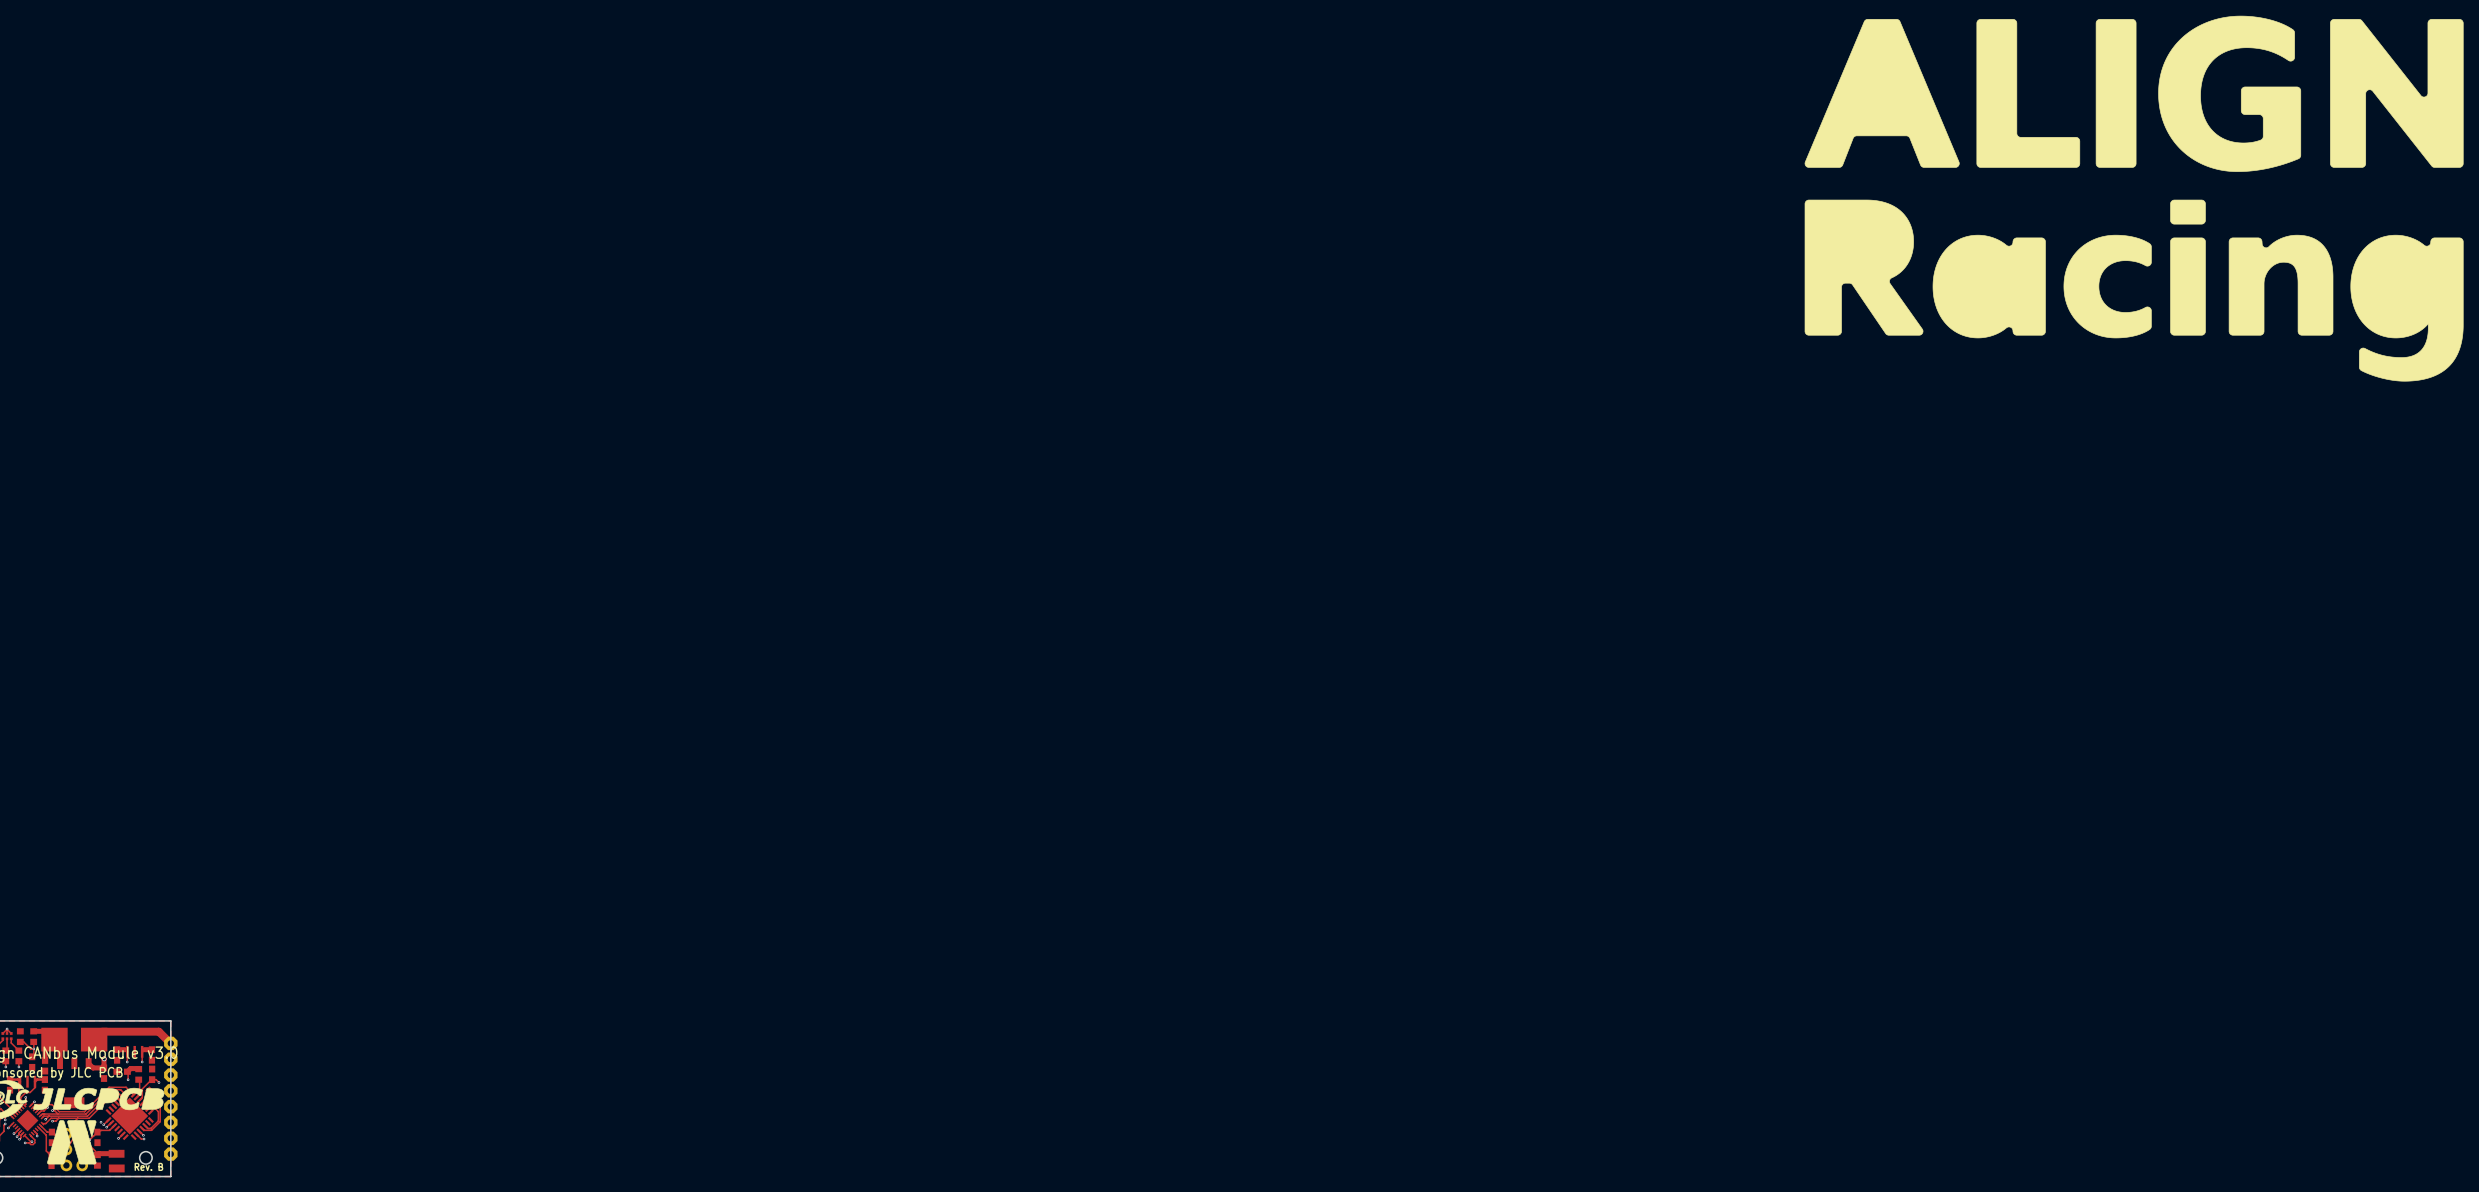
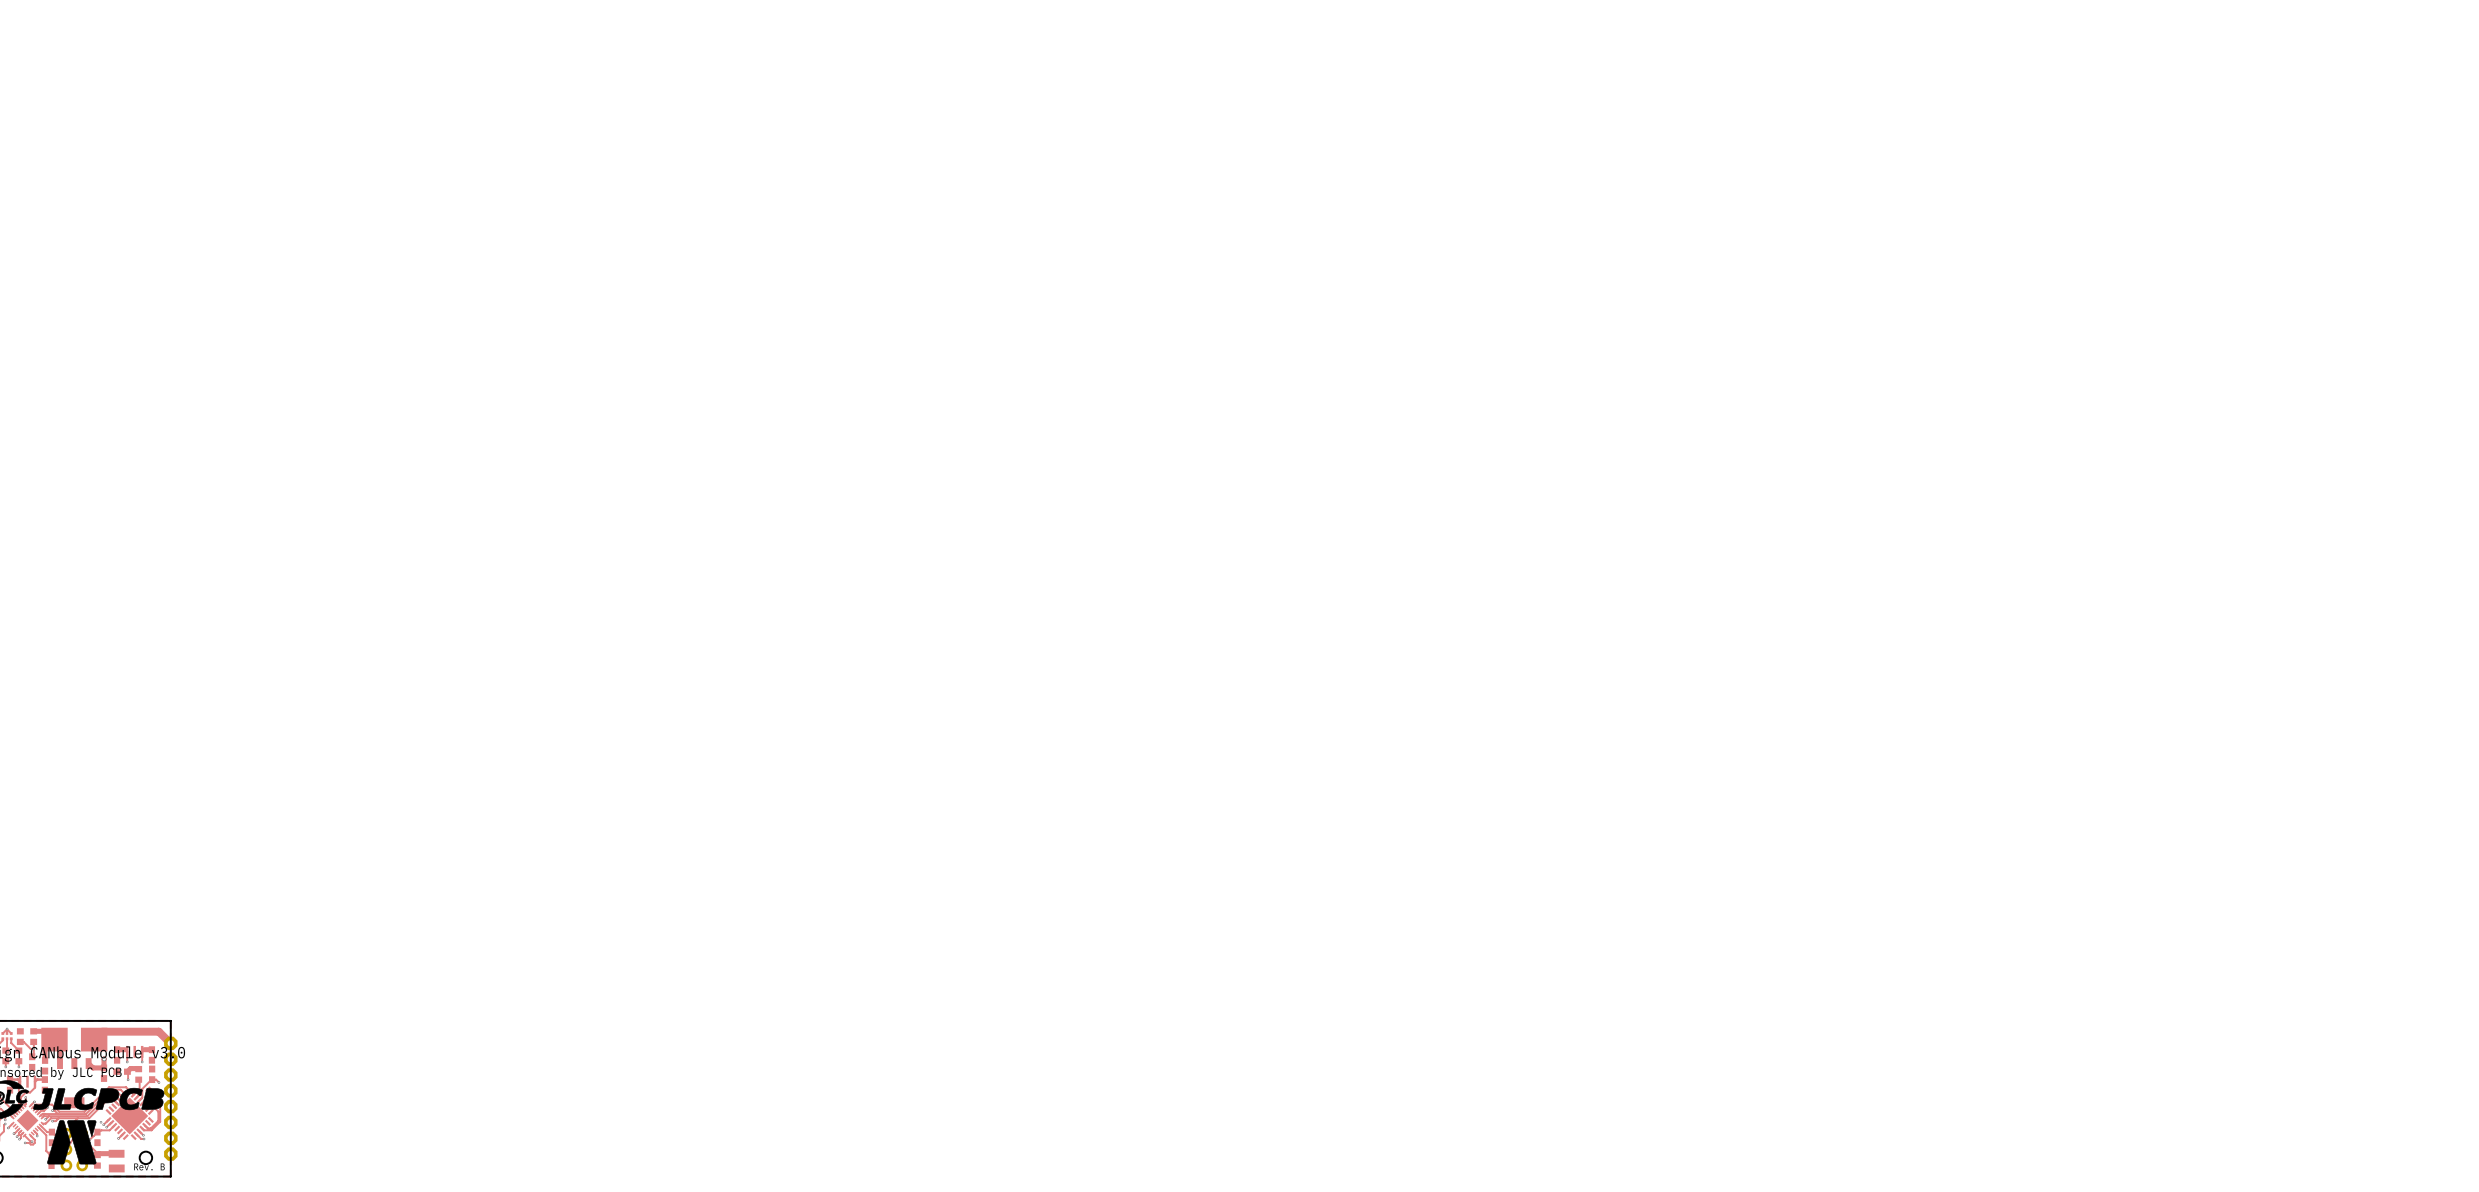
drawing: [2158, 15, 2302, 172] -> none
drawing: [1804, 18, 1960, 168] -> none
drawing: [1976, 18, 2081, 168] -> none
drawing: [2095, 18, 2137, 168] -> none
drawing: [2330, 18, 2464, 168] -> none
drawing: [1804, 199, 1924, 336] -> none
drawing: [2170, 199, 2206, 225] -> none
drawing: [1932, 234, 2046, 339] -> none
drawing: [2063, 234, 2152, 339] -> none
drawing: [2228, 234, 2334, 336] -> none
drawing: [2350, 234, 2464, 382] -> none
drawing: [2170, 237, 2206, 336] -> none

